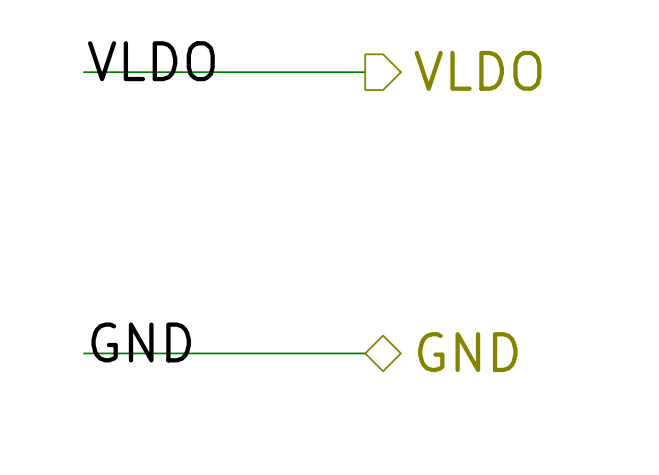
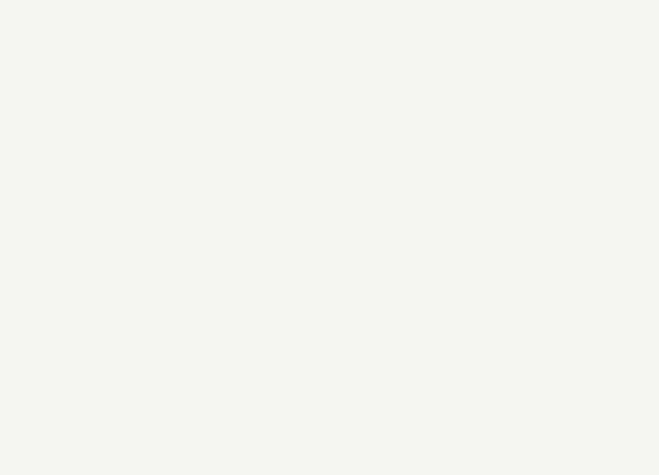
label: VLDO (151, 61) -> none
hierarchical label: VLDO (478, 70) -> none
wire: (83, 72) (365, 72) -> none
label: GND (141, 342) -> none
hierarchical label: GND (467, 352) -> none
wire: (83, 353) (365, 353) -> none

